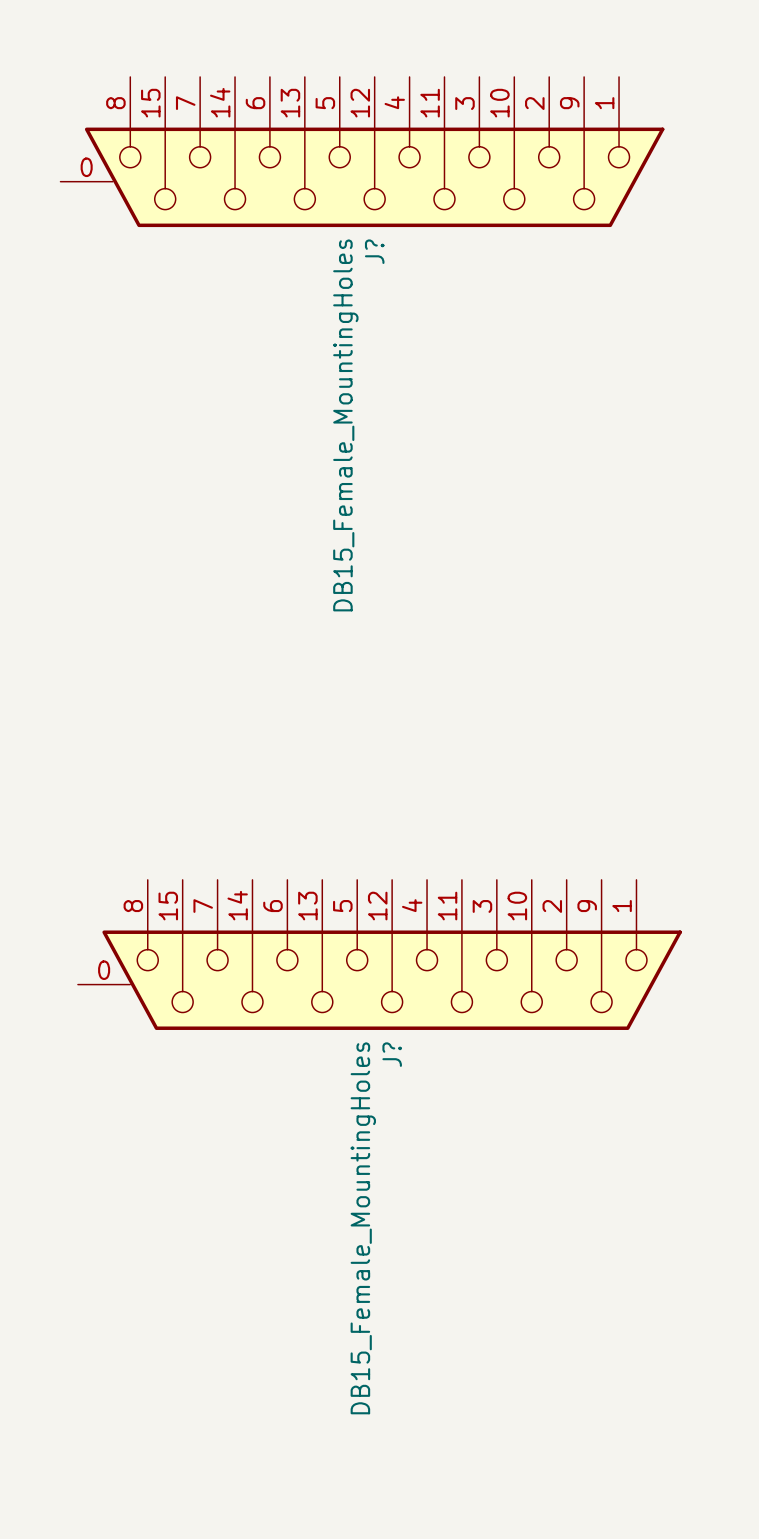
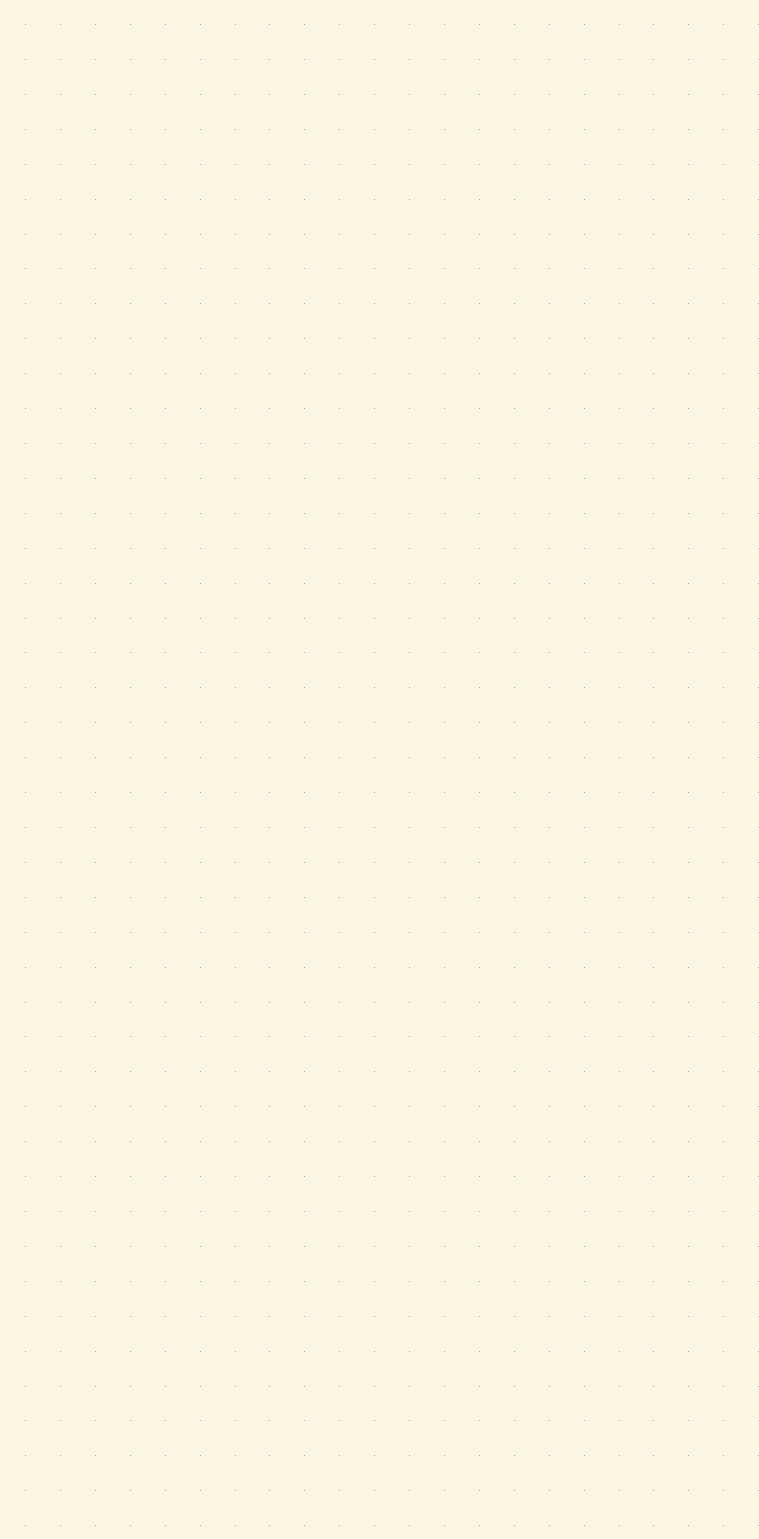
J?: DB15_Female_MountingHoles (362, 152) -> none
J?: DB15_Female_MountingHoles (379, 954) -> none

